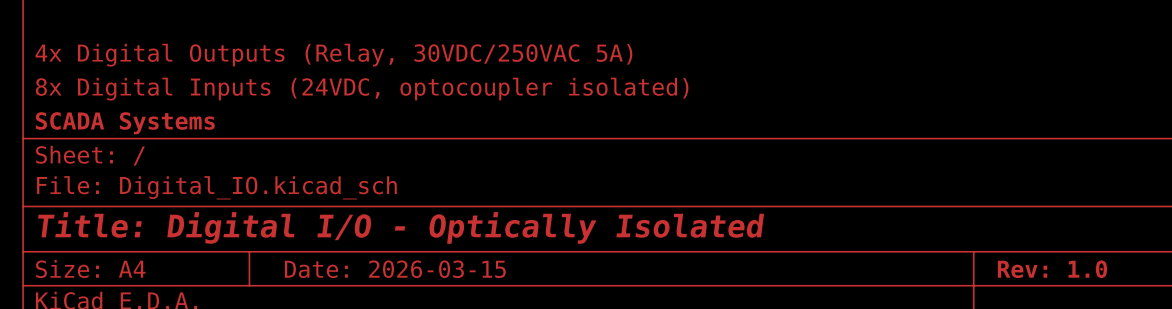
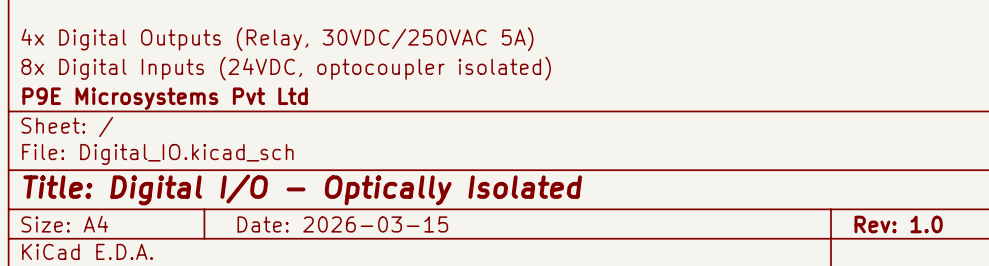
title block: SCADA Systems (125, 123) -> P9E Microsystems Pvt Ltd (165, 98)

